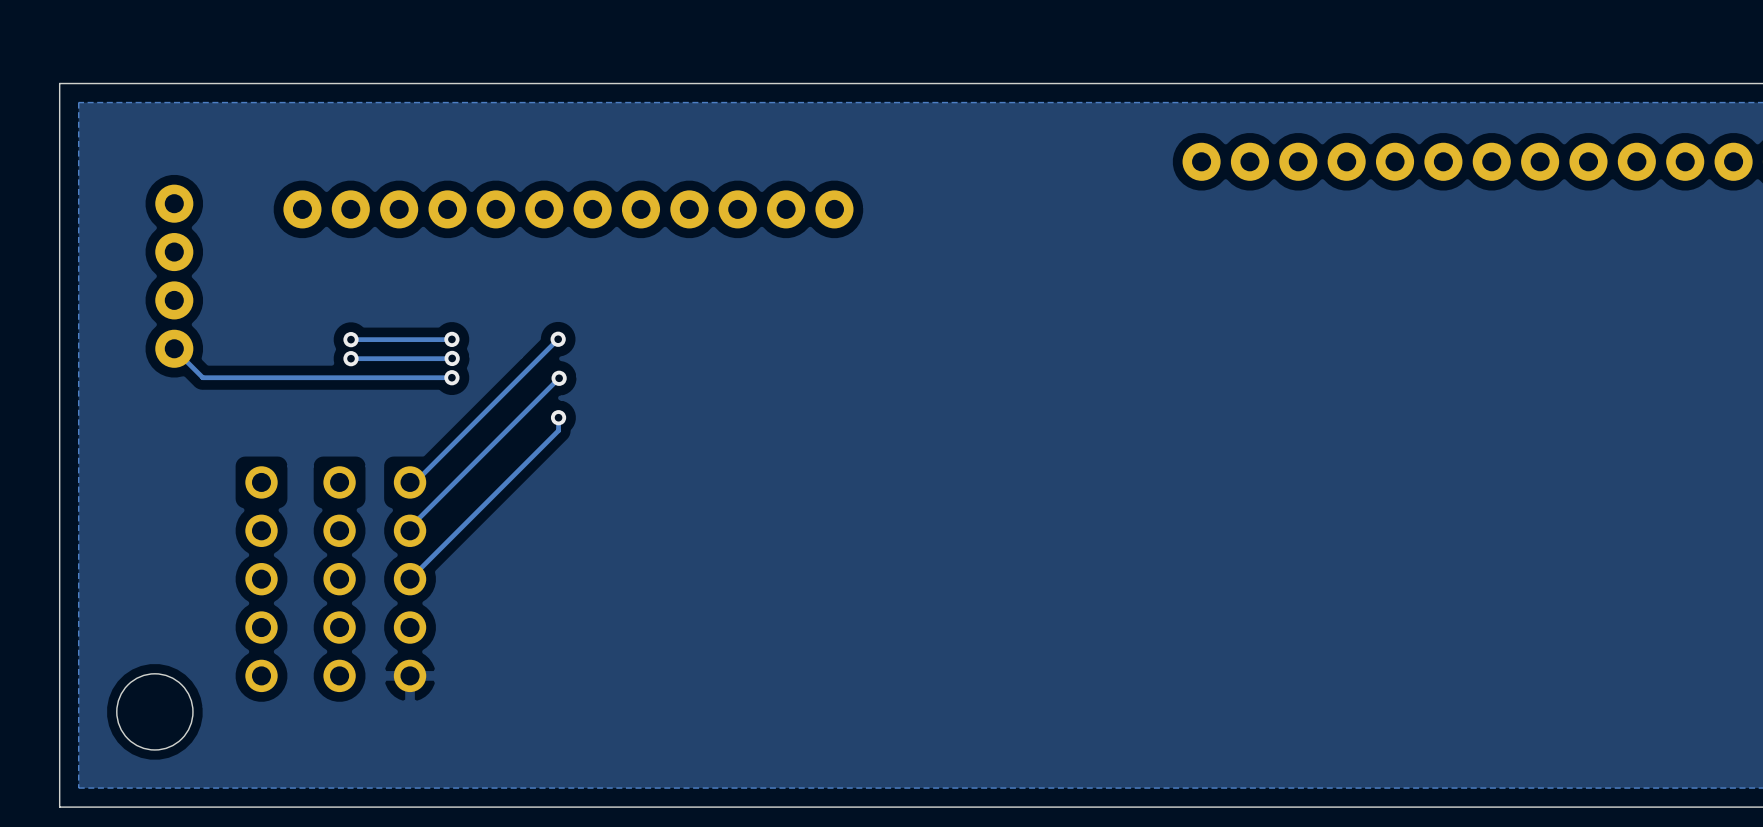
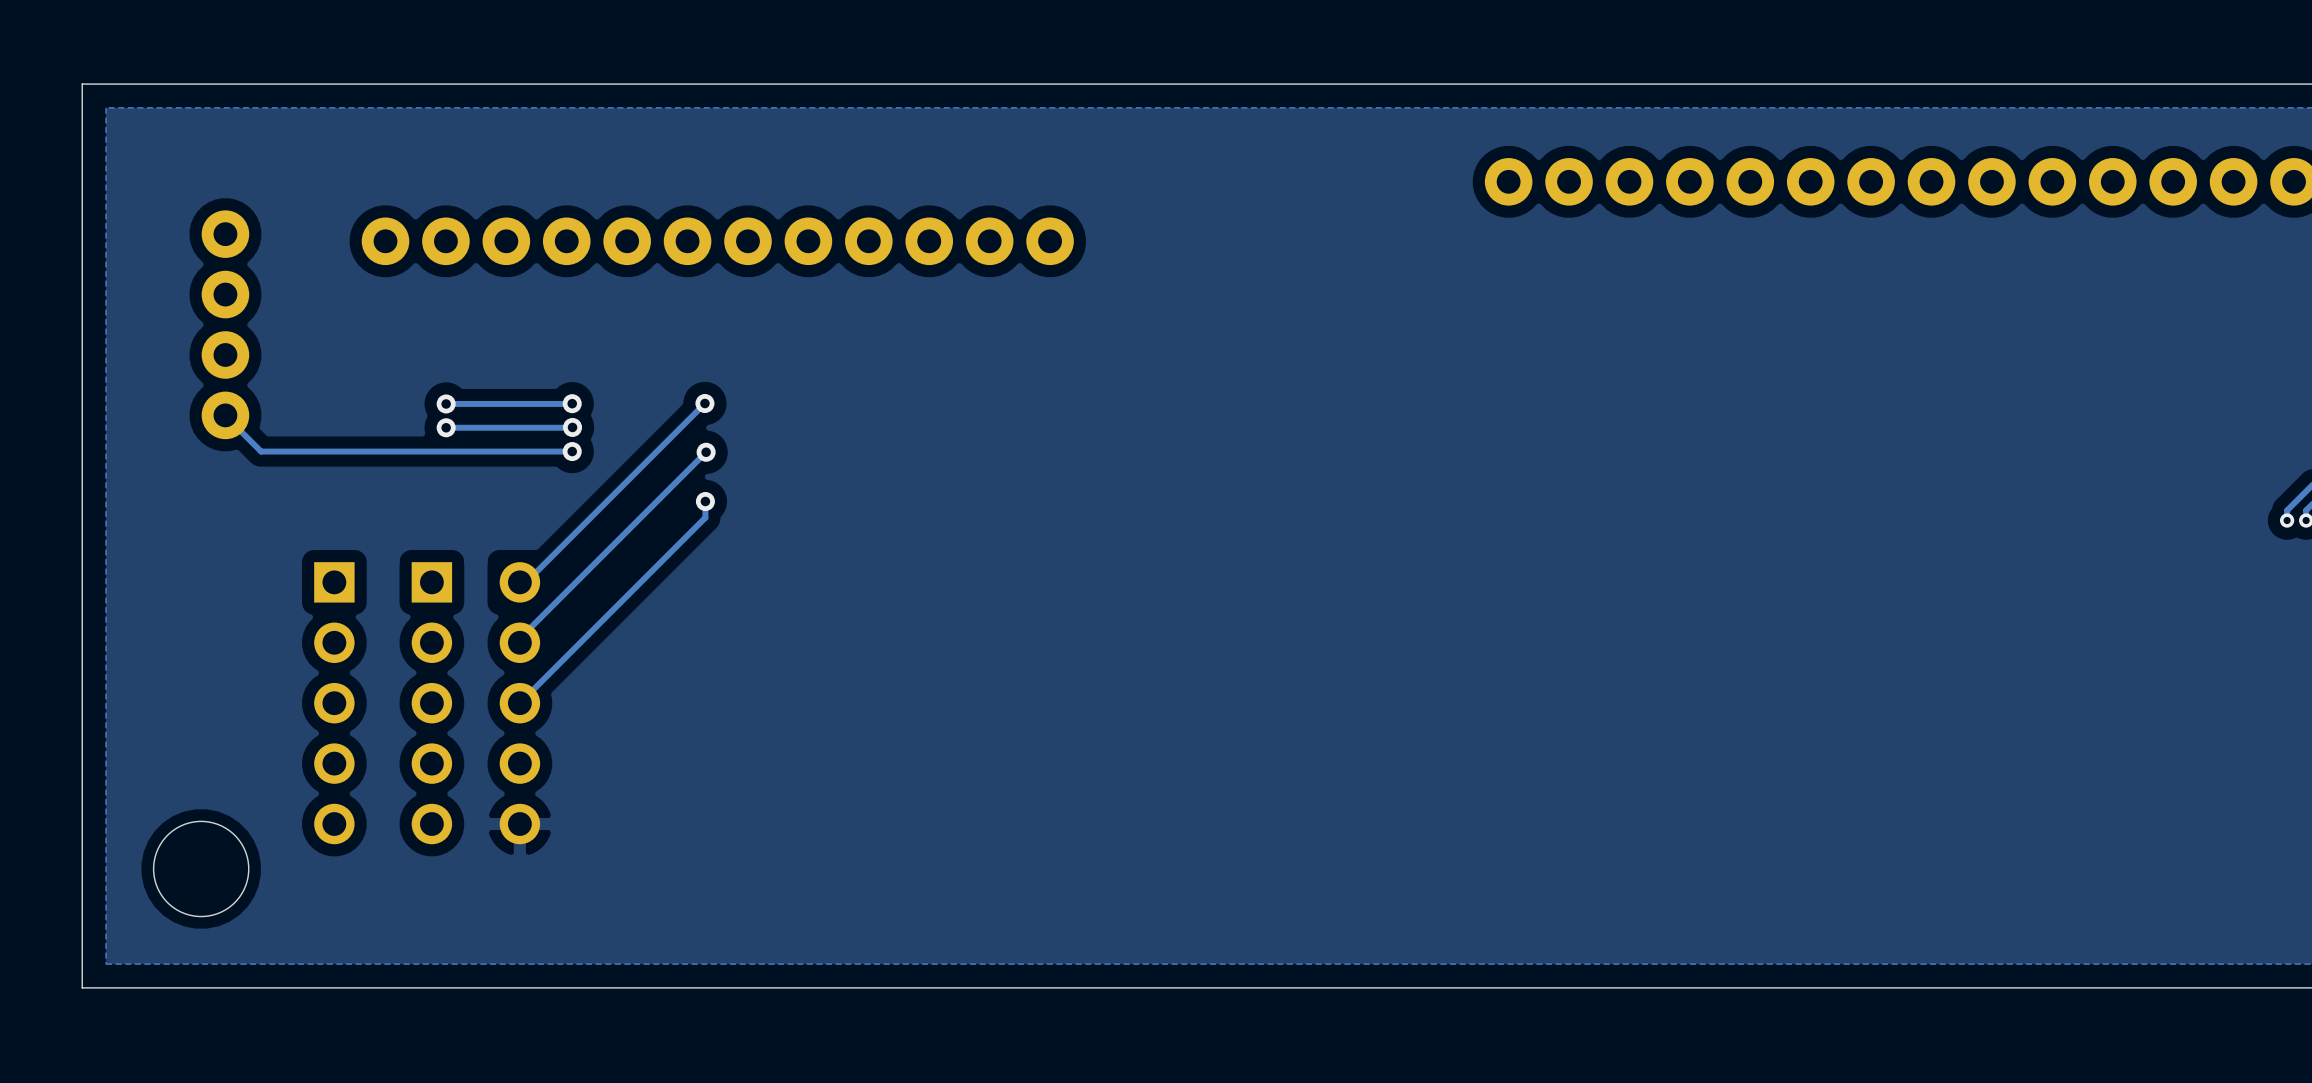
part footprint: [245, 466, 278, 693] -> [314, 562, 355, 845]
part footprint: [323, 466, 356, 693] -> [411, 562, 453, 845]

